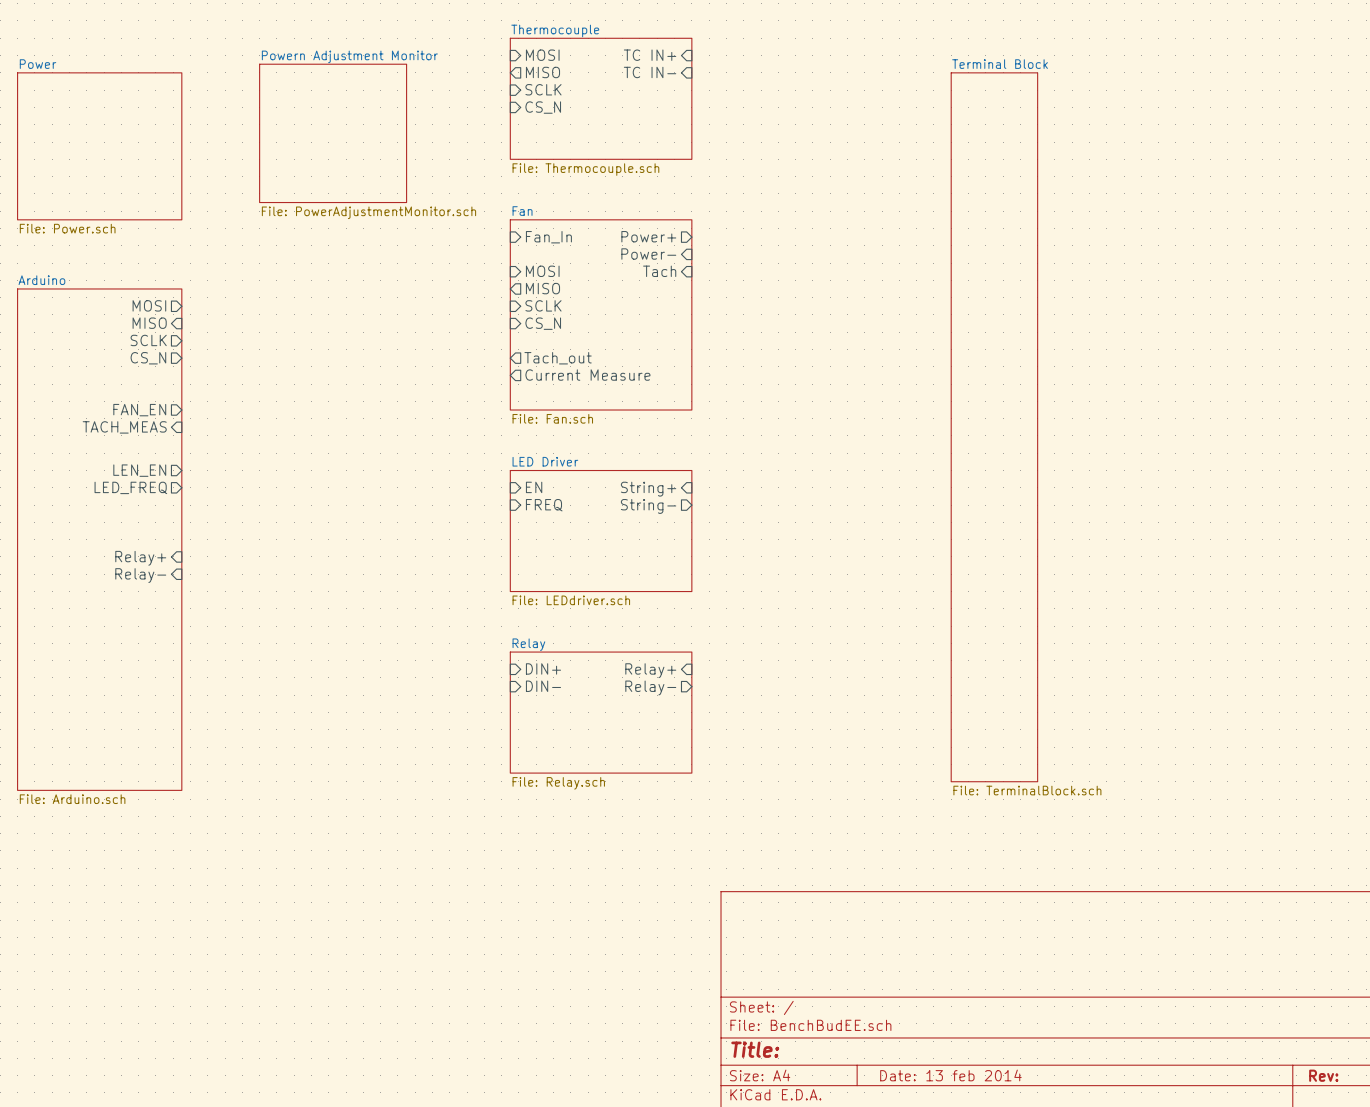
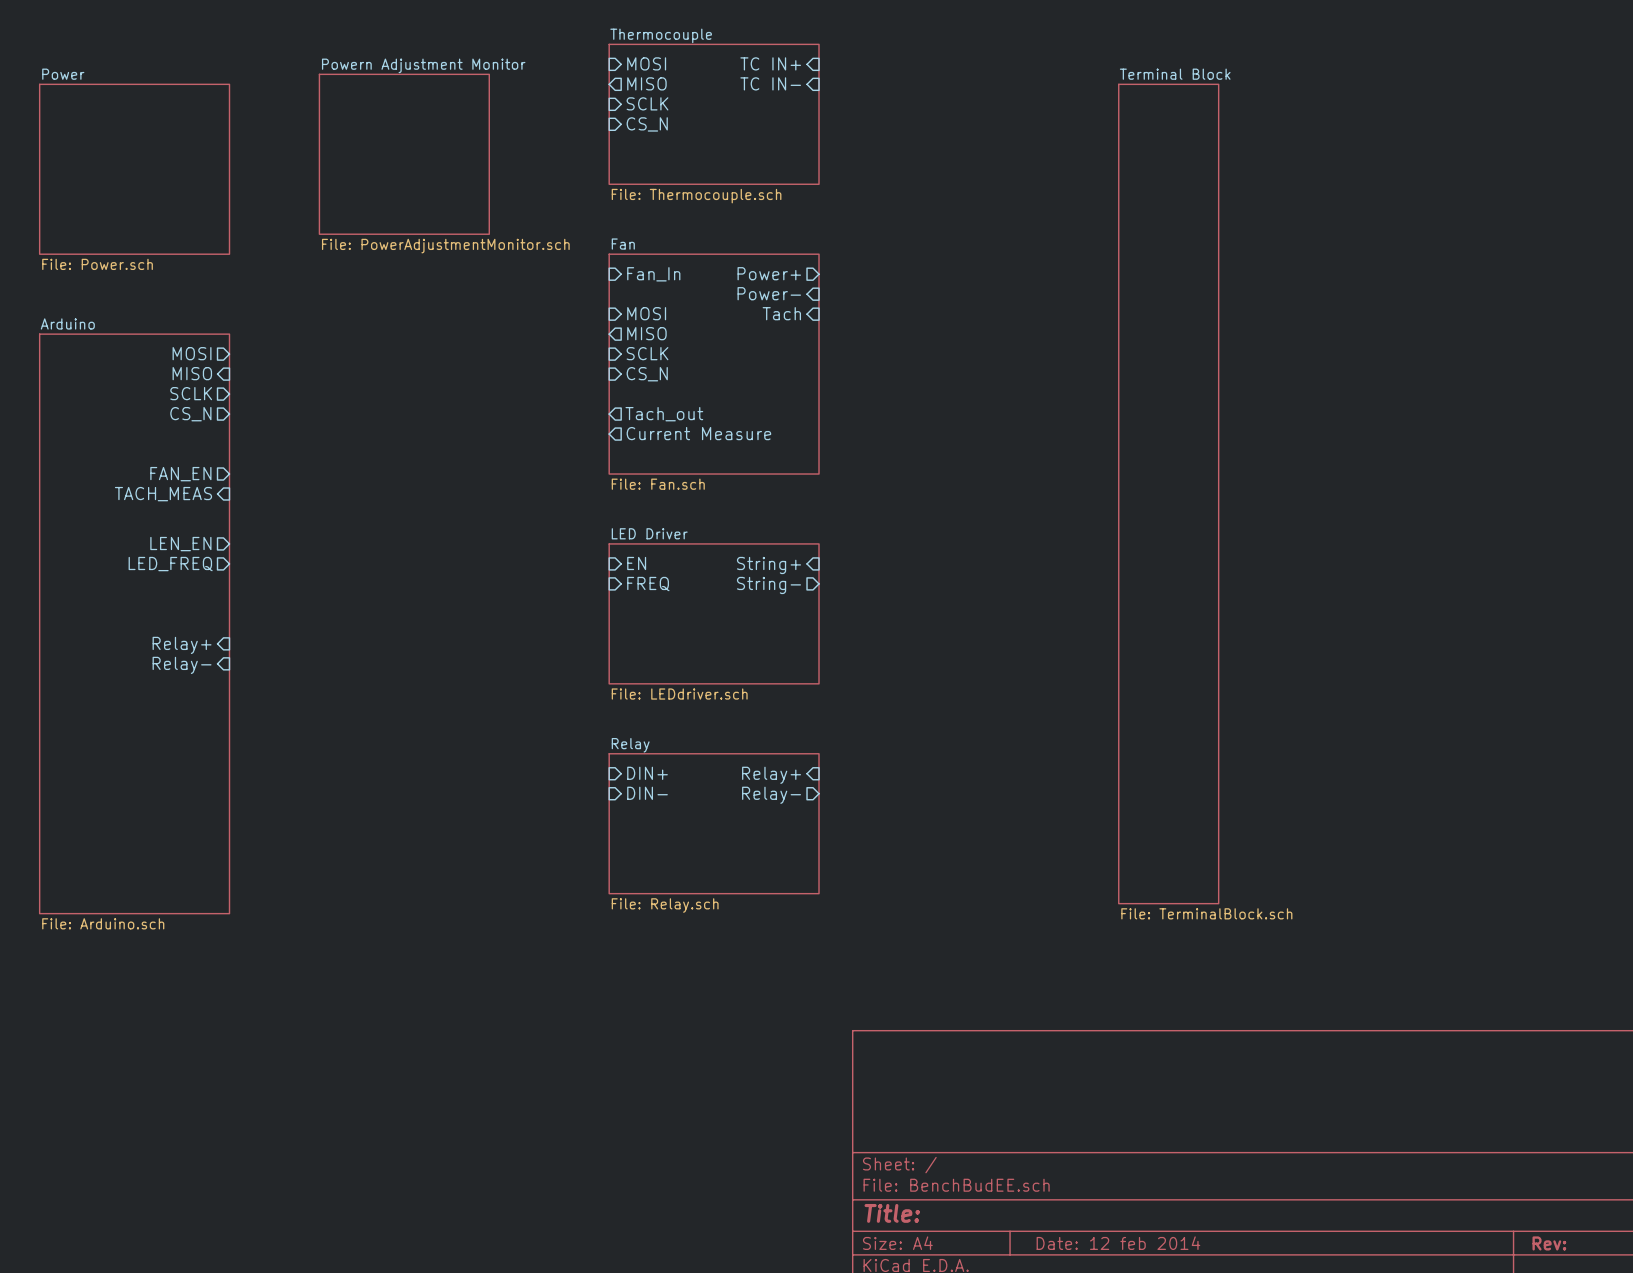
title block: Date: 13 feb 2014 (950, 1075) -> Date: 12 feb 2014 (1118, 1243)

